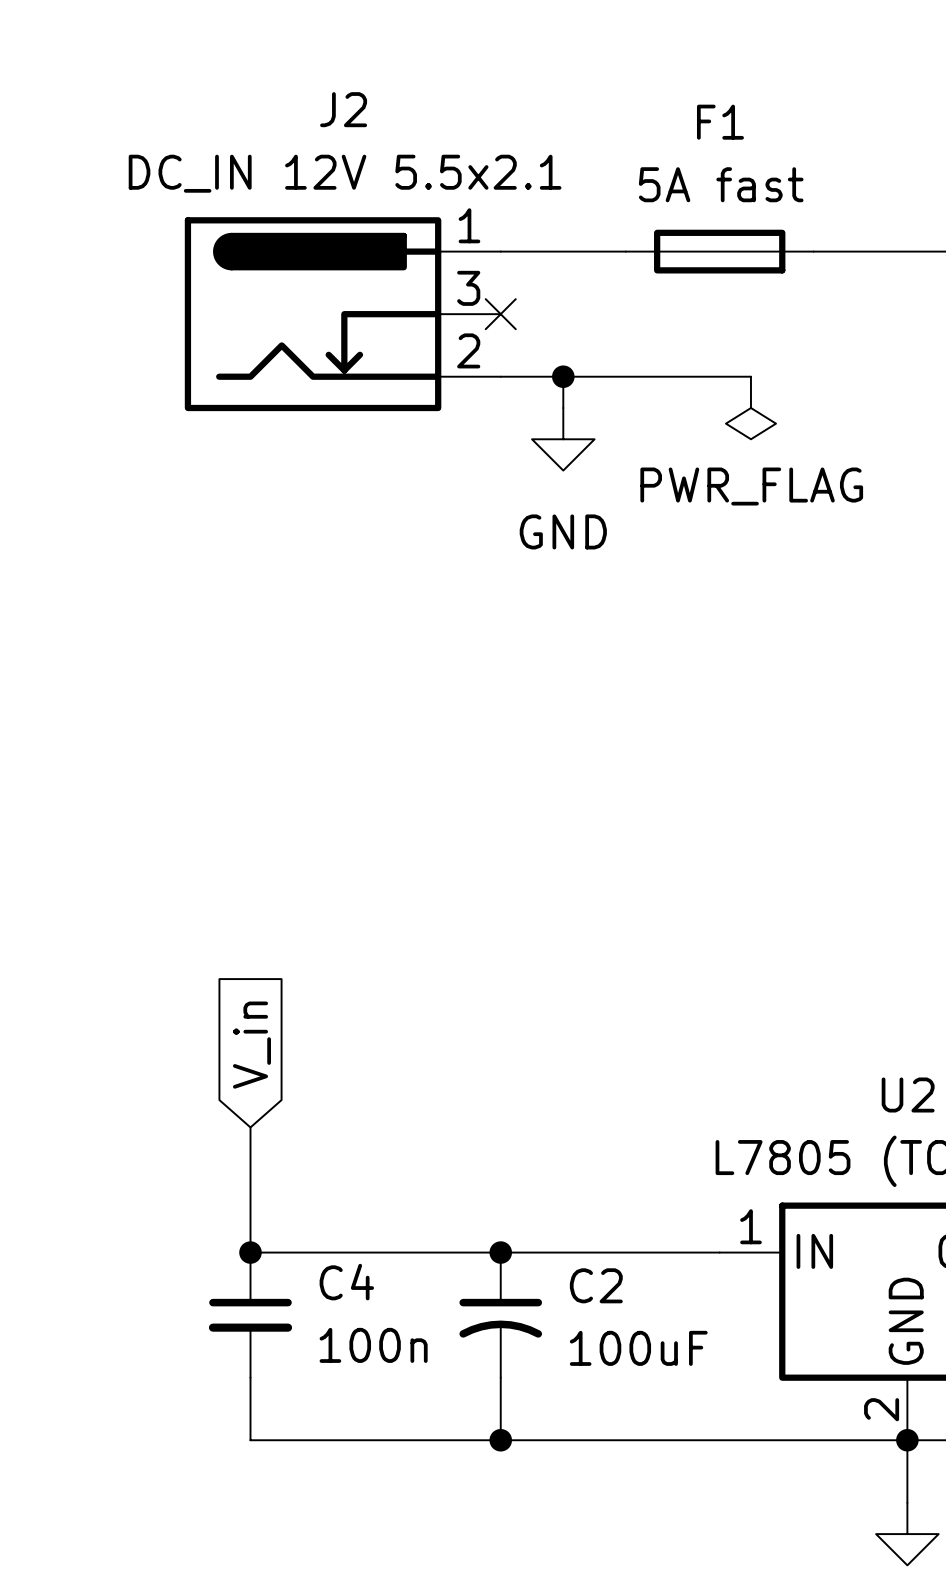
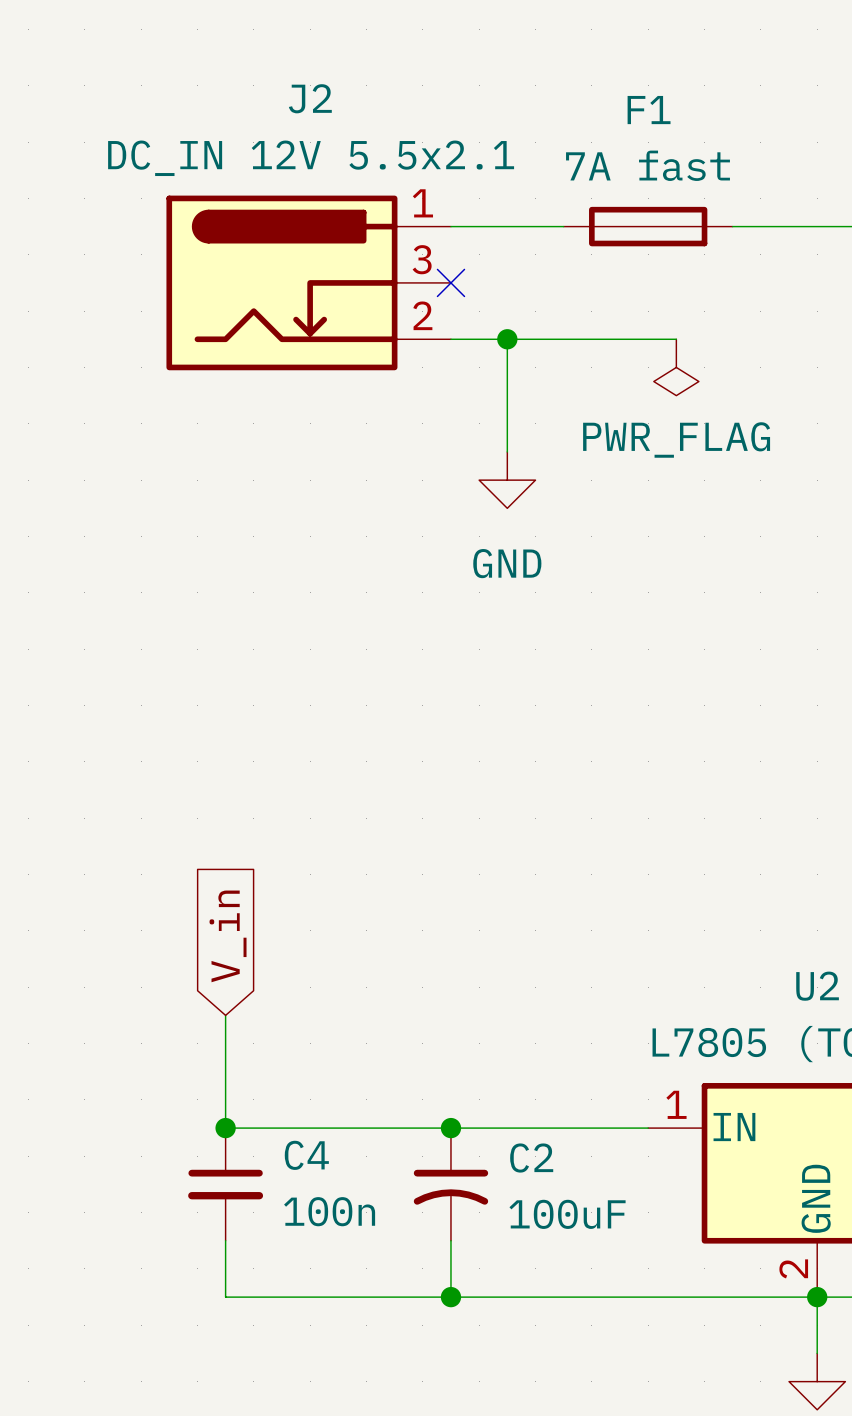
F1 value: 5A fast (721, 184) -> 7A fast (648, 165)
wire: none -> (507, 367) (507, 451)
power symbol position: GND (563, 439) -> GND (507, 480)

